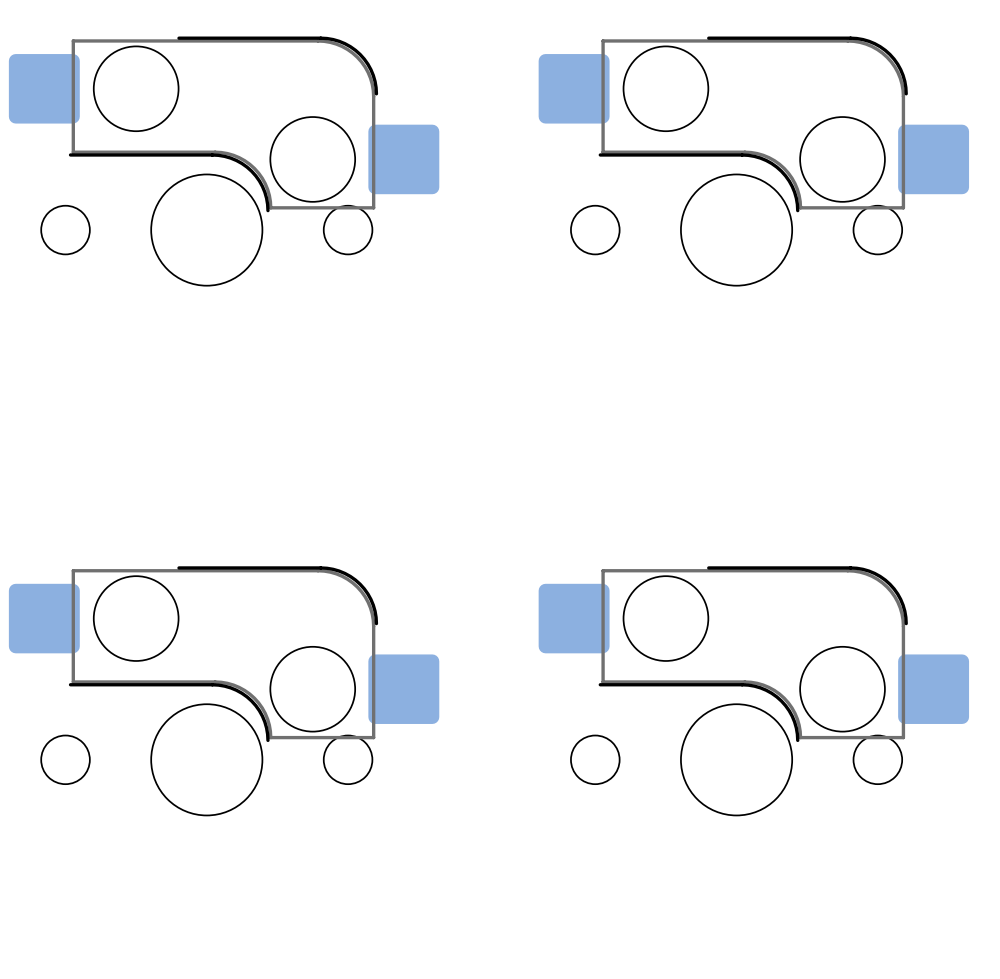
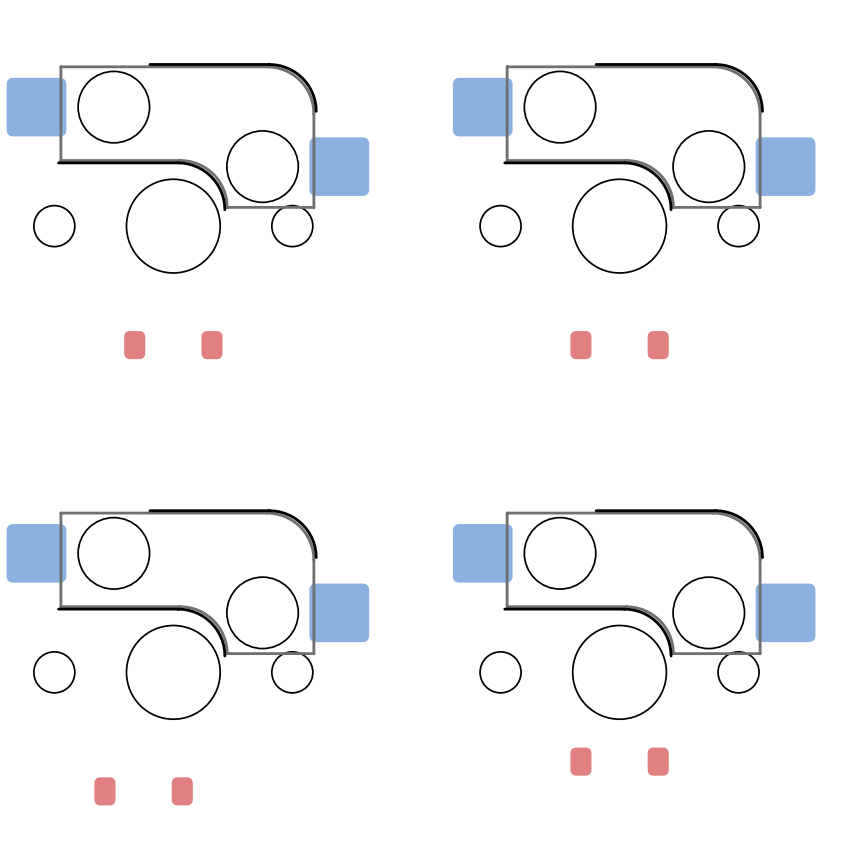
part: none -> (173, 345)
part: none -> (619, 345)
part: none -> (619, 761)
part: none -> (143, 791)

